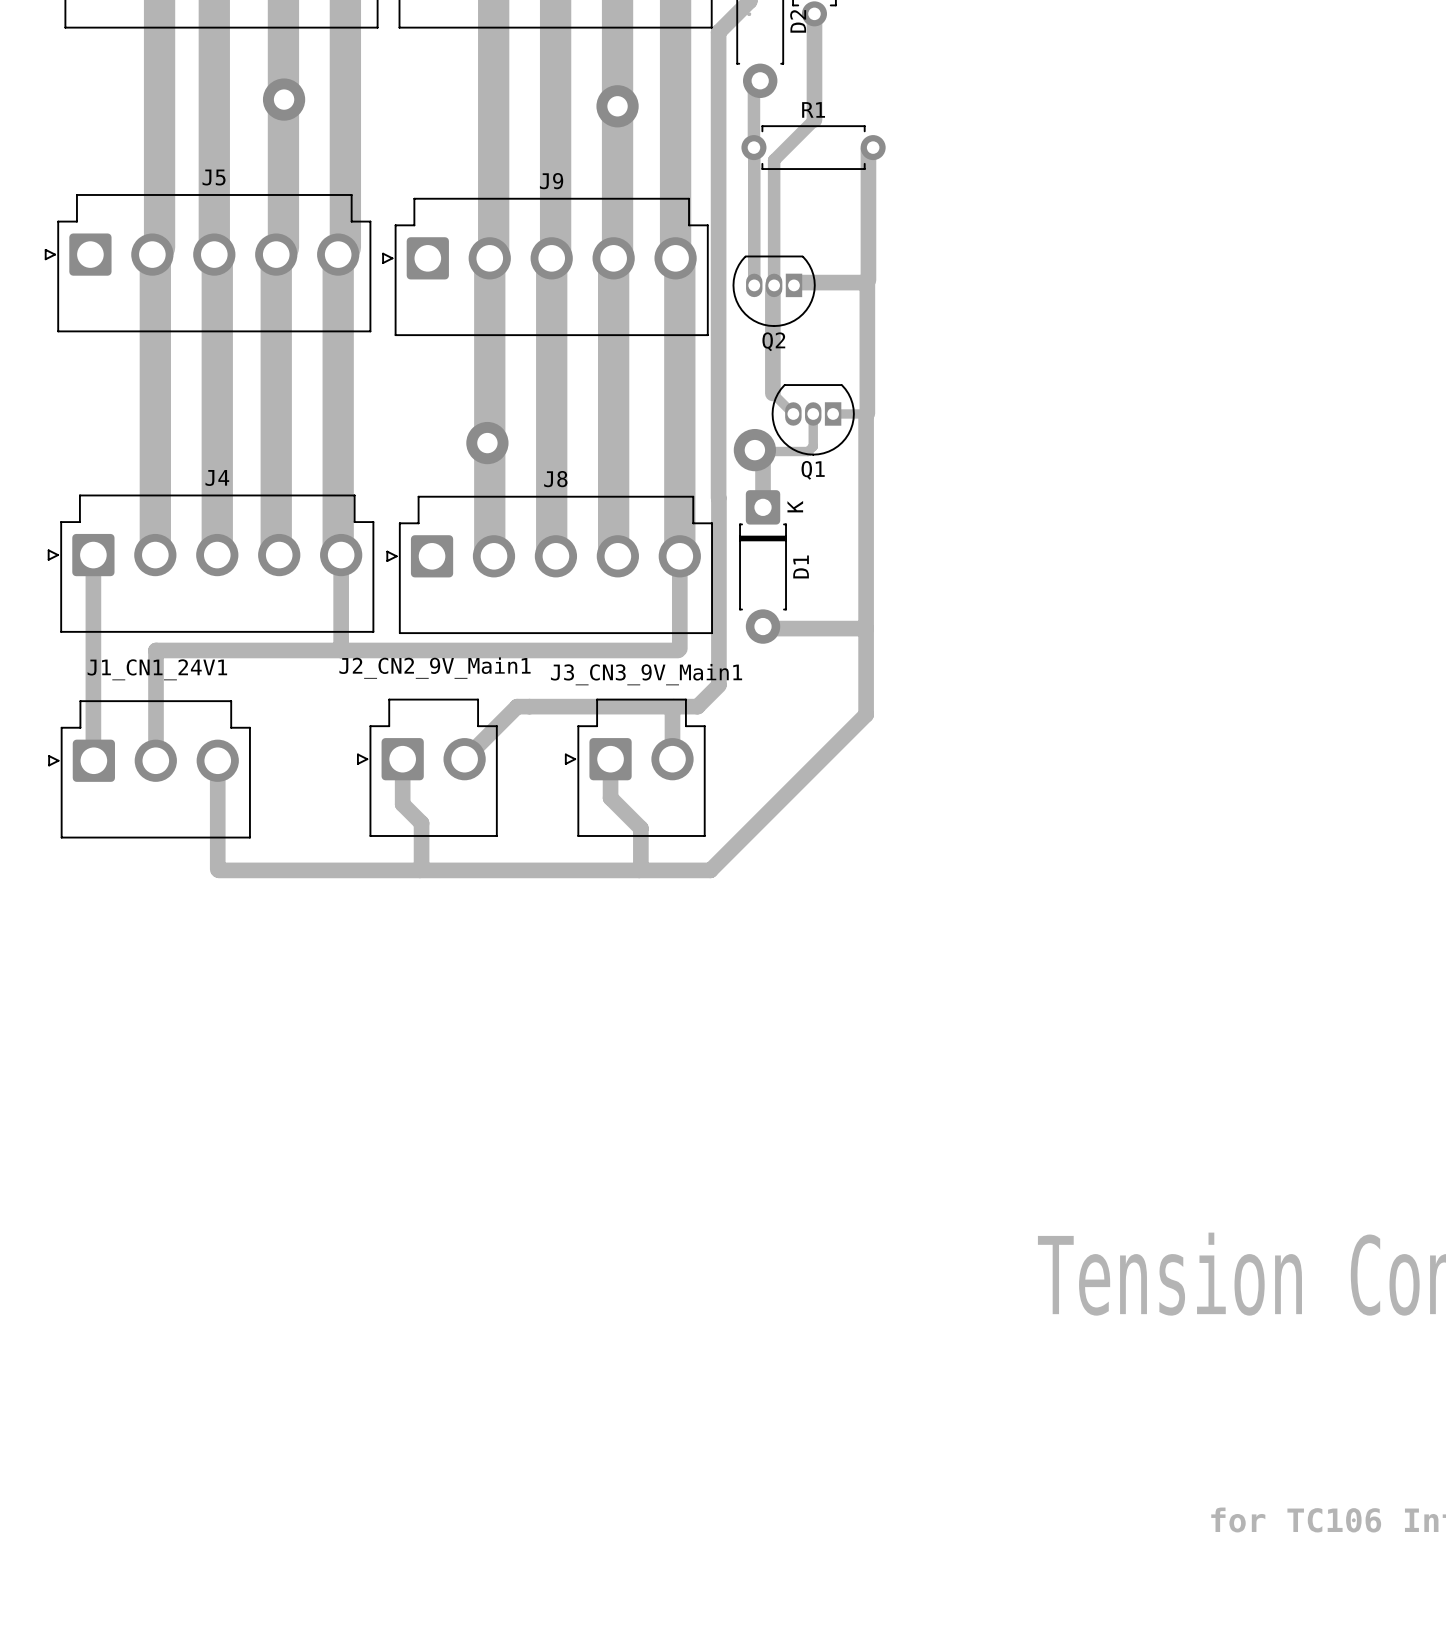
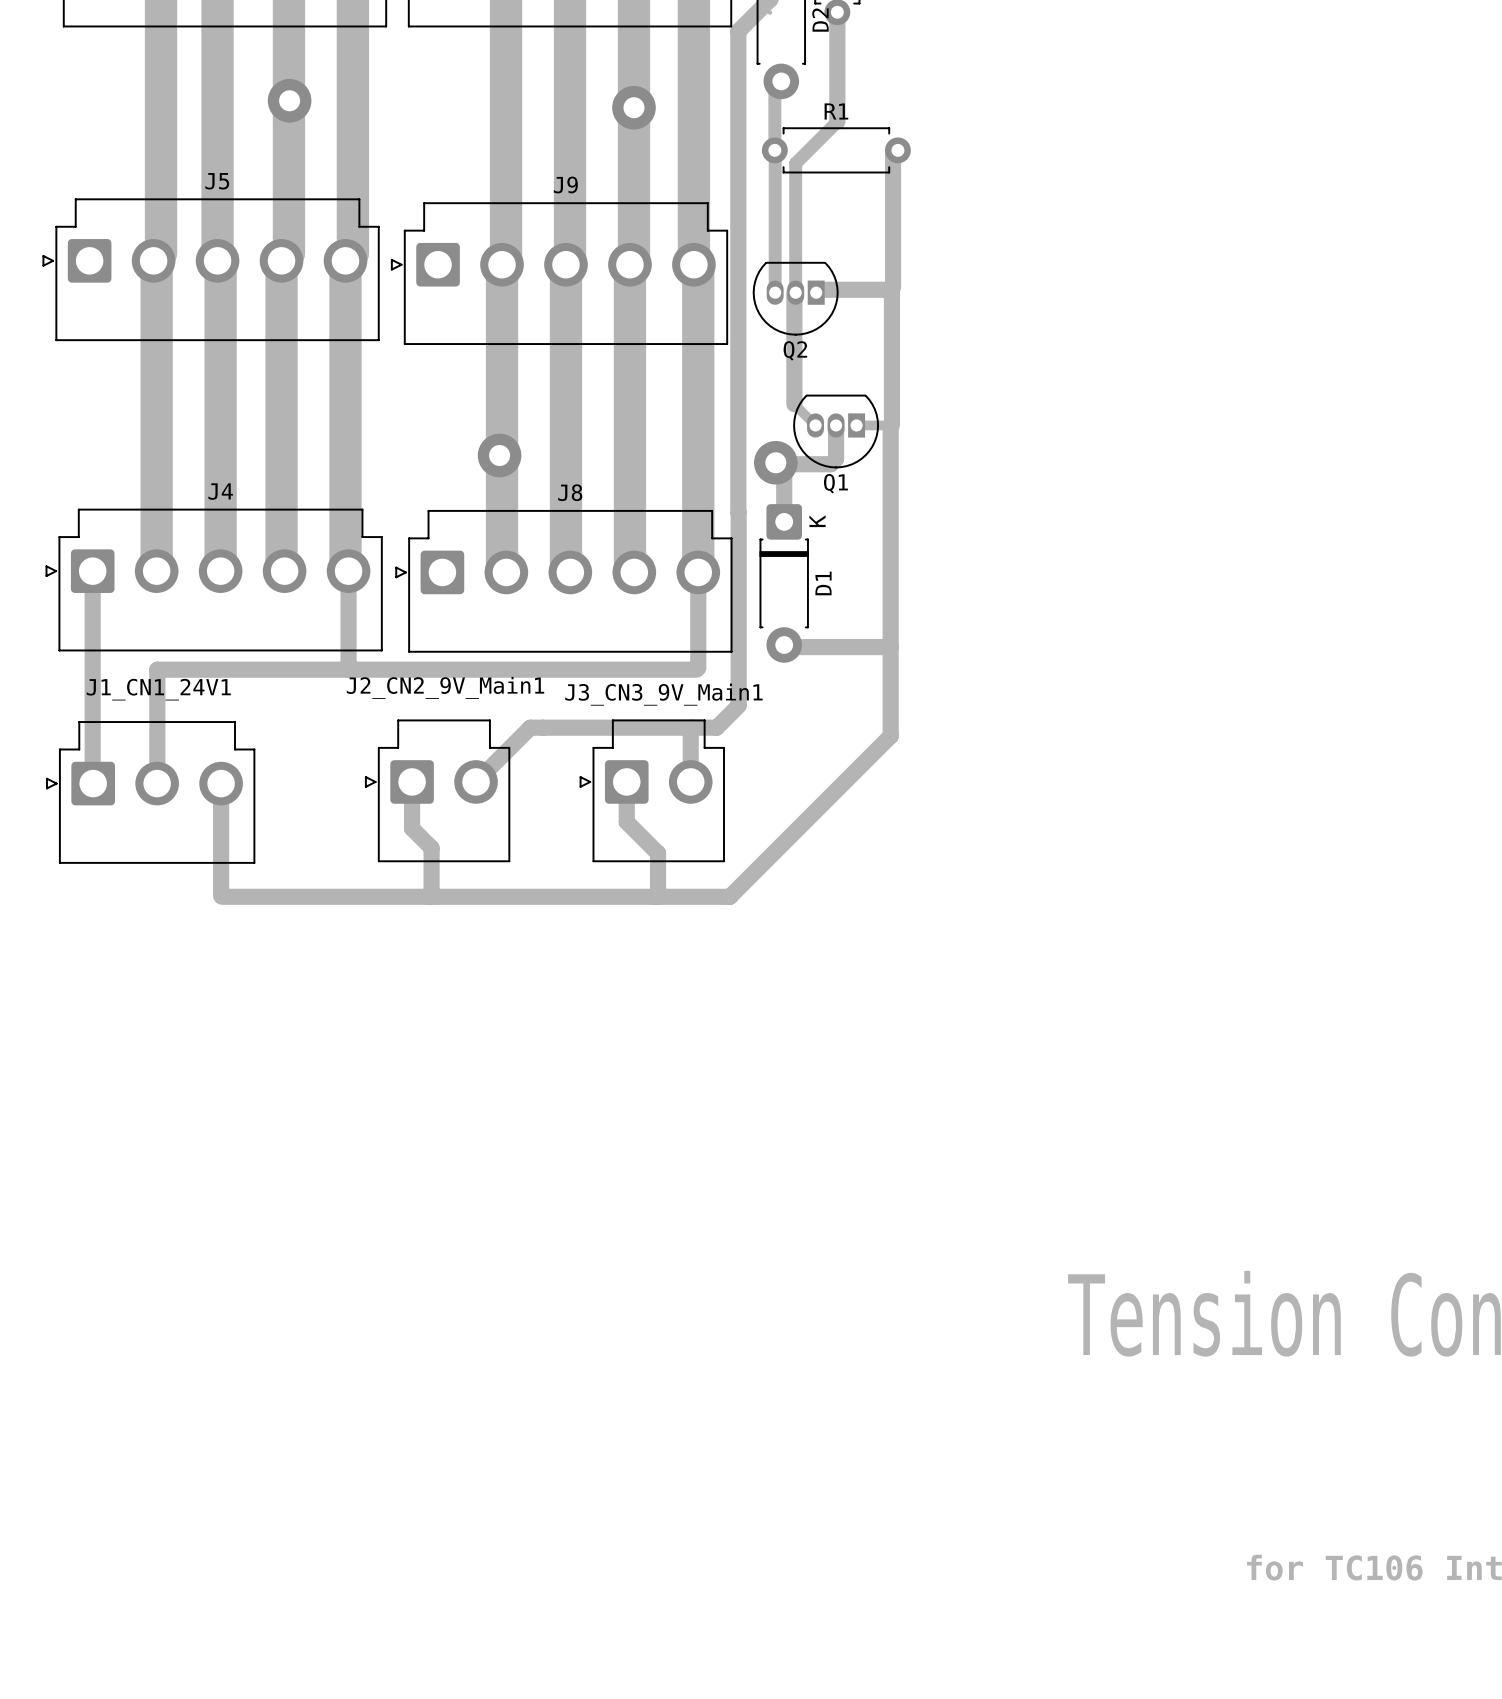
track width: thin (813, 413) (813, 446) (808, 451) (767, 451) -> thick (836, 425) (836, 459) (830, 464) (788, 464)

